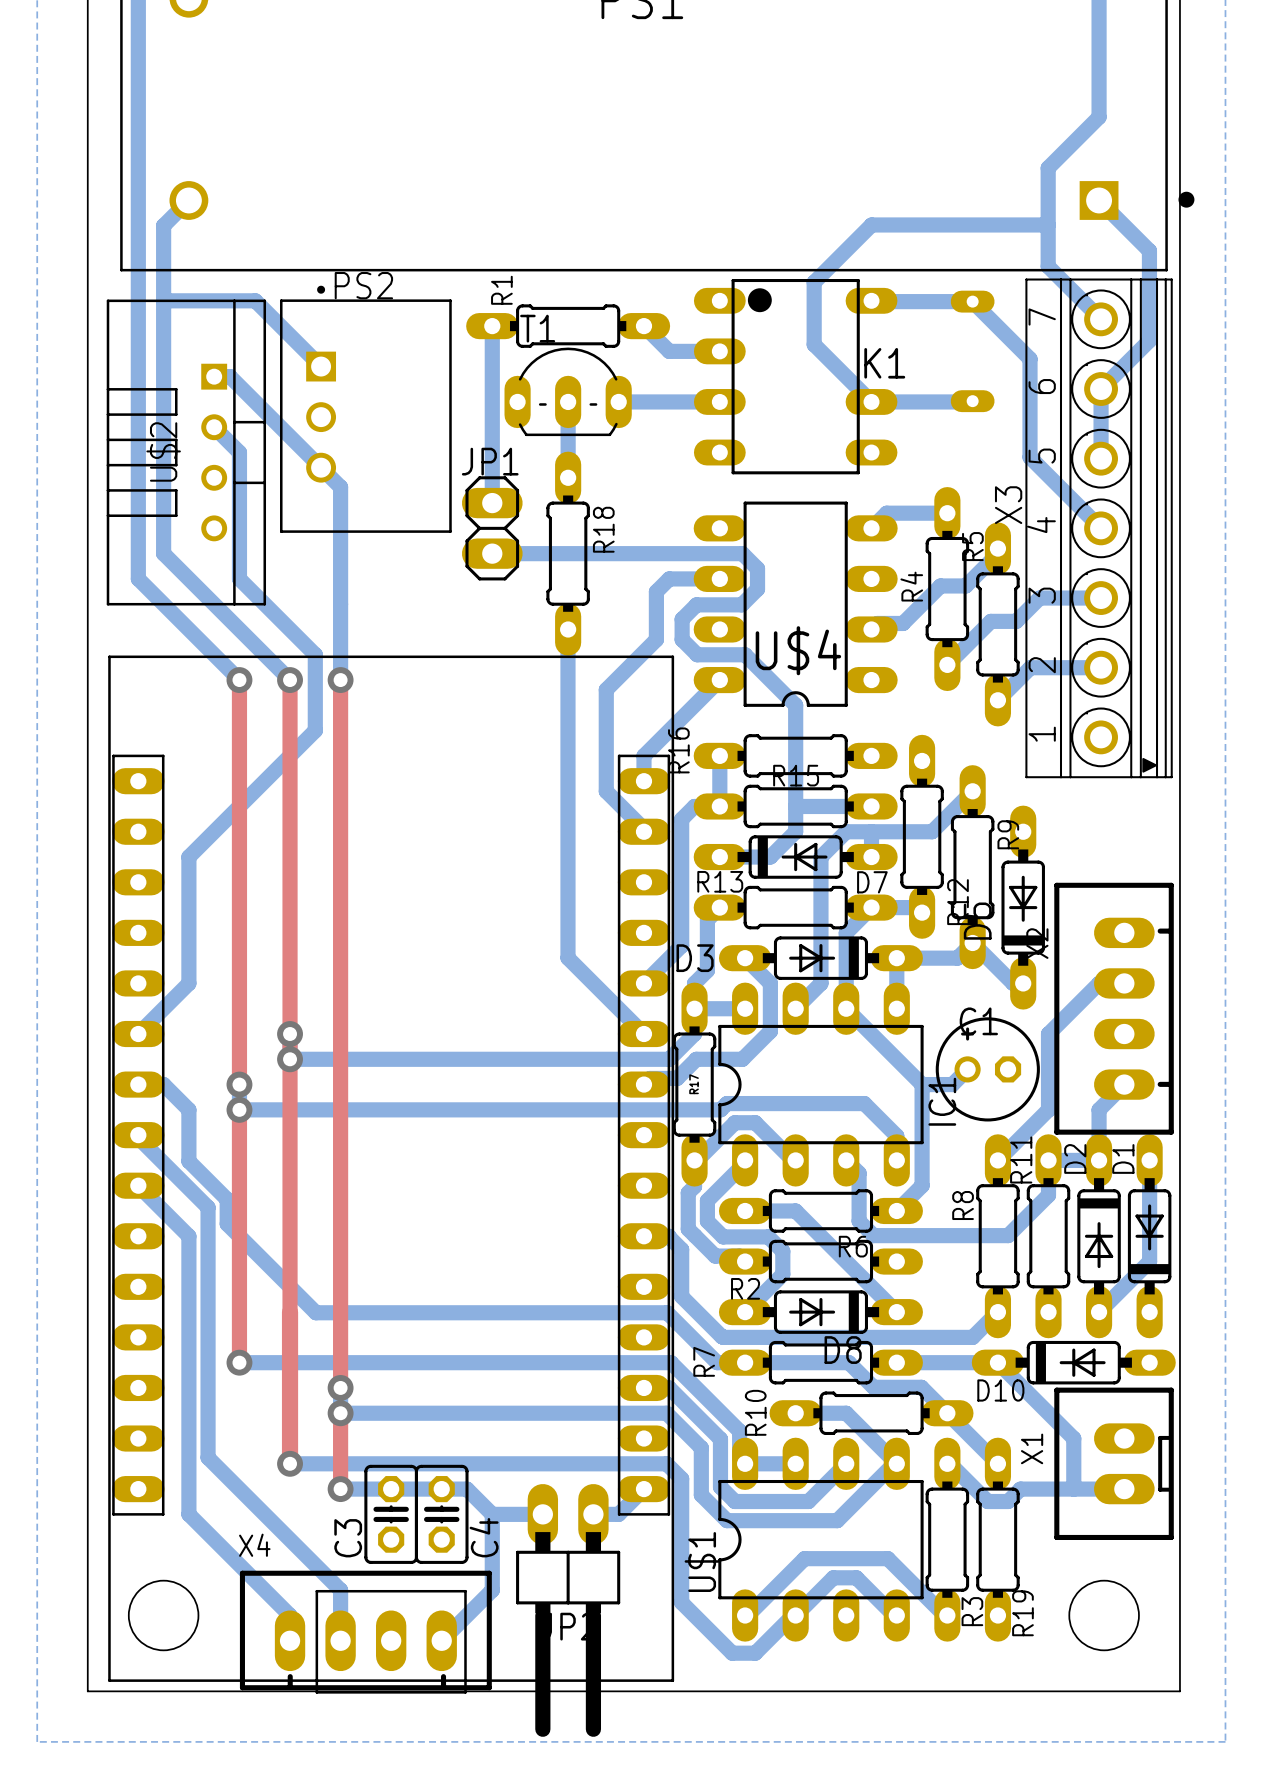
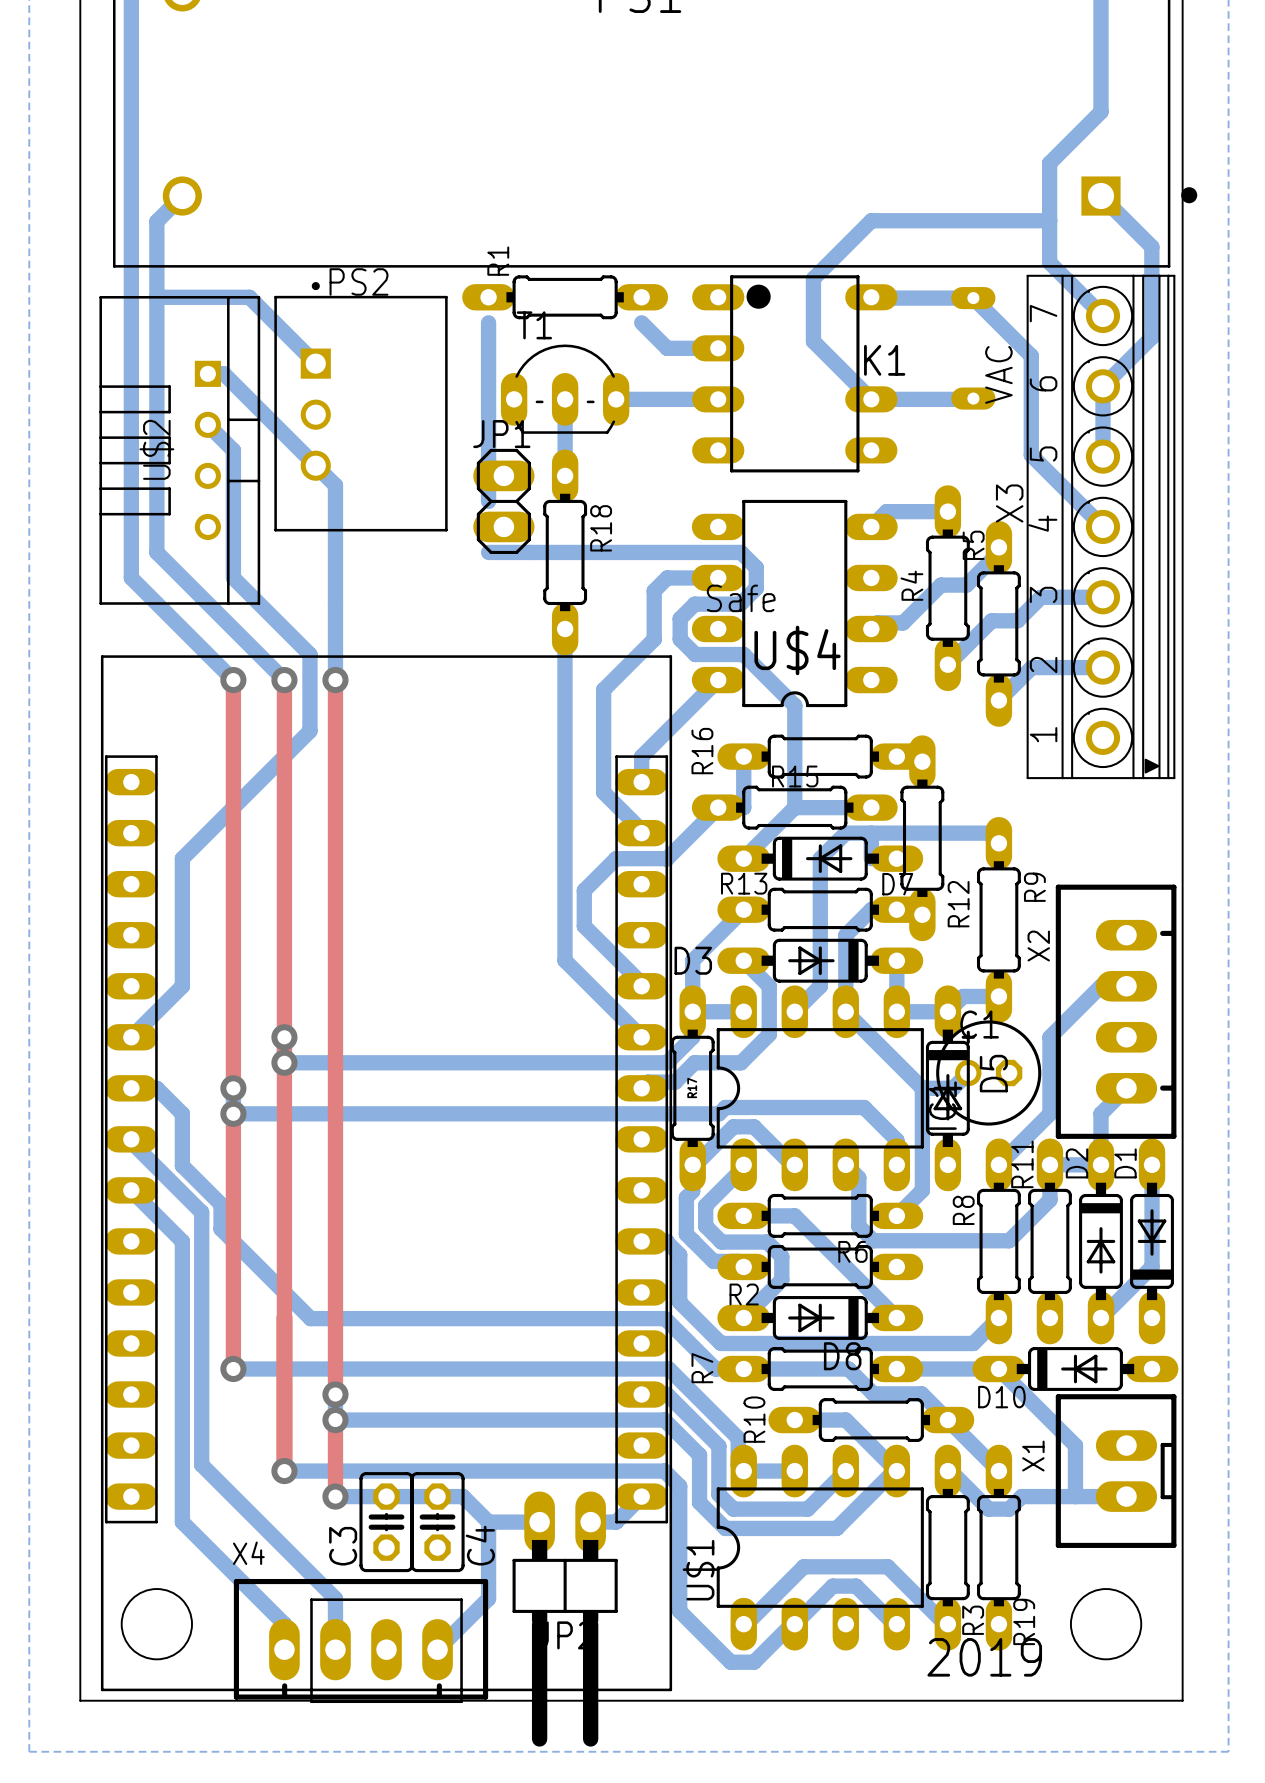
R1 position: (568, 326) -> (565, 297)
text: none -> VAC (998, 374)
JP1 position: (492, 528) -> (503, 501)
text: none -> Safe (741, 598)
bottom track: (719, 755) (719, 806) (694, 806) (681, 819) (681, 945) (643, 983) -> (667, 858) (616, 858) (584, 890) (584, 926) (641, 983) (641, 986)
bottom track: none -> (743, 756) (743, 807) (718, 807) (666, 859)
R16 position: (795, 755) -> (820, 756)
bottom track: (972, 791) (932, 831) -> (998, 843) (988, 833) (932, 833)
bottom track: (795, 806) (795, 831) (770, 857) (719, 857) -> (794, 807) (743, 858)
D7 position: (795, 857) -> (820, 858)
R9 position: (972, 867) -> (998, 919)
bottom track: (719, 907) (707, 920) (707, 970) (694, 983) -> (743, 909) (692, 960) (692, 986)
R13 position: (795, 907) -> (820, 909)
D5 rotation: 0° (1023, 907) -> 180° (947, 1088)
D5 position: (1023, 907) -> (947, 1088)
bottom track: (896, 958) (957, 958) (972, 942) (1013, 983) (1023, 983) -> none
bottom track: none -> (998, 996) (963, 996) (947, 1011) (896, 1011)
text: none -> 2019 (984, 1657)

